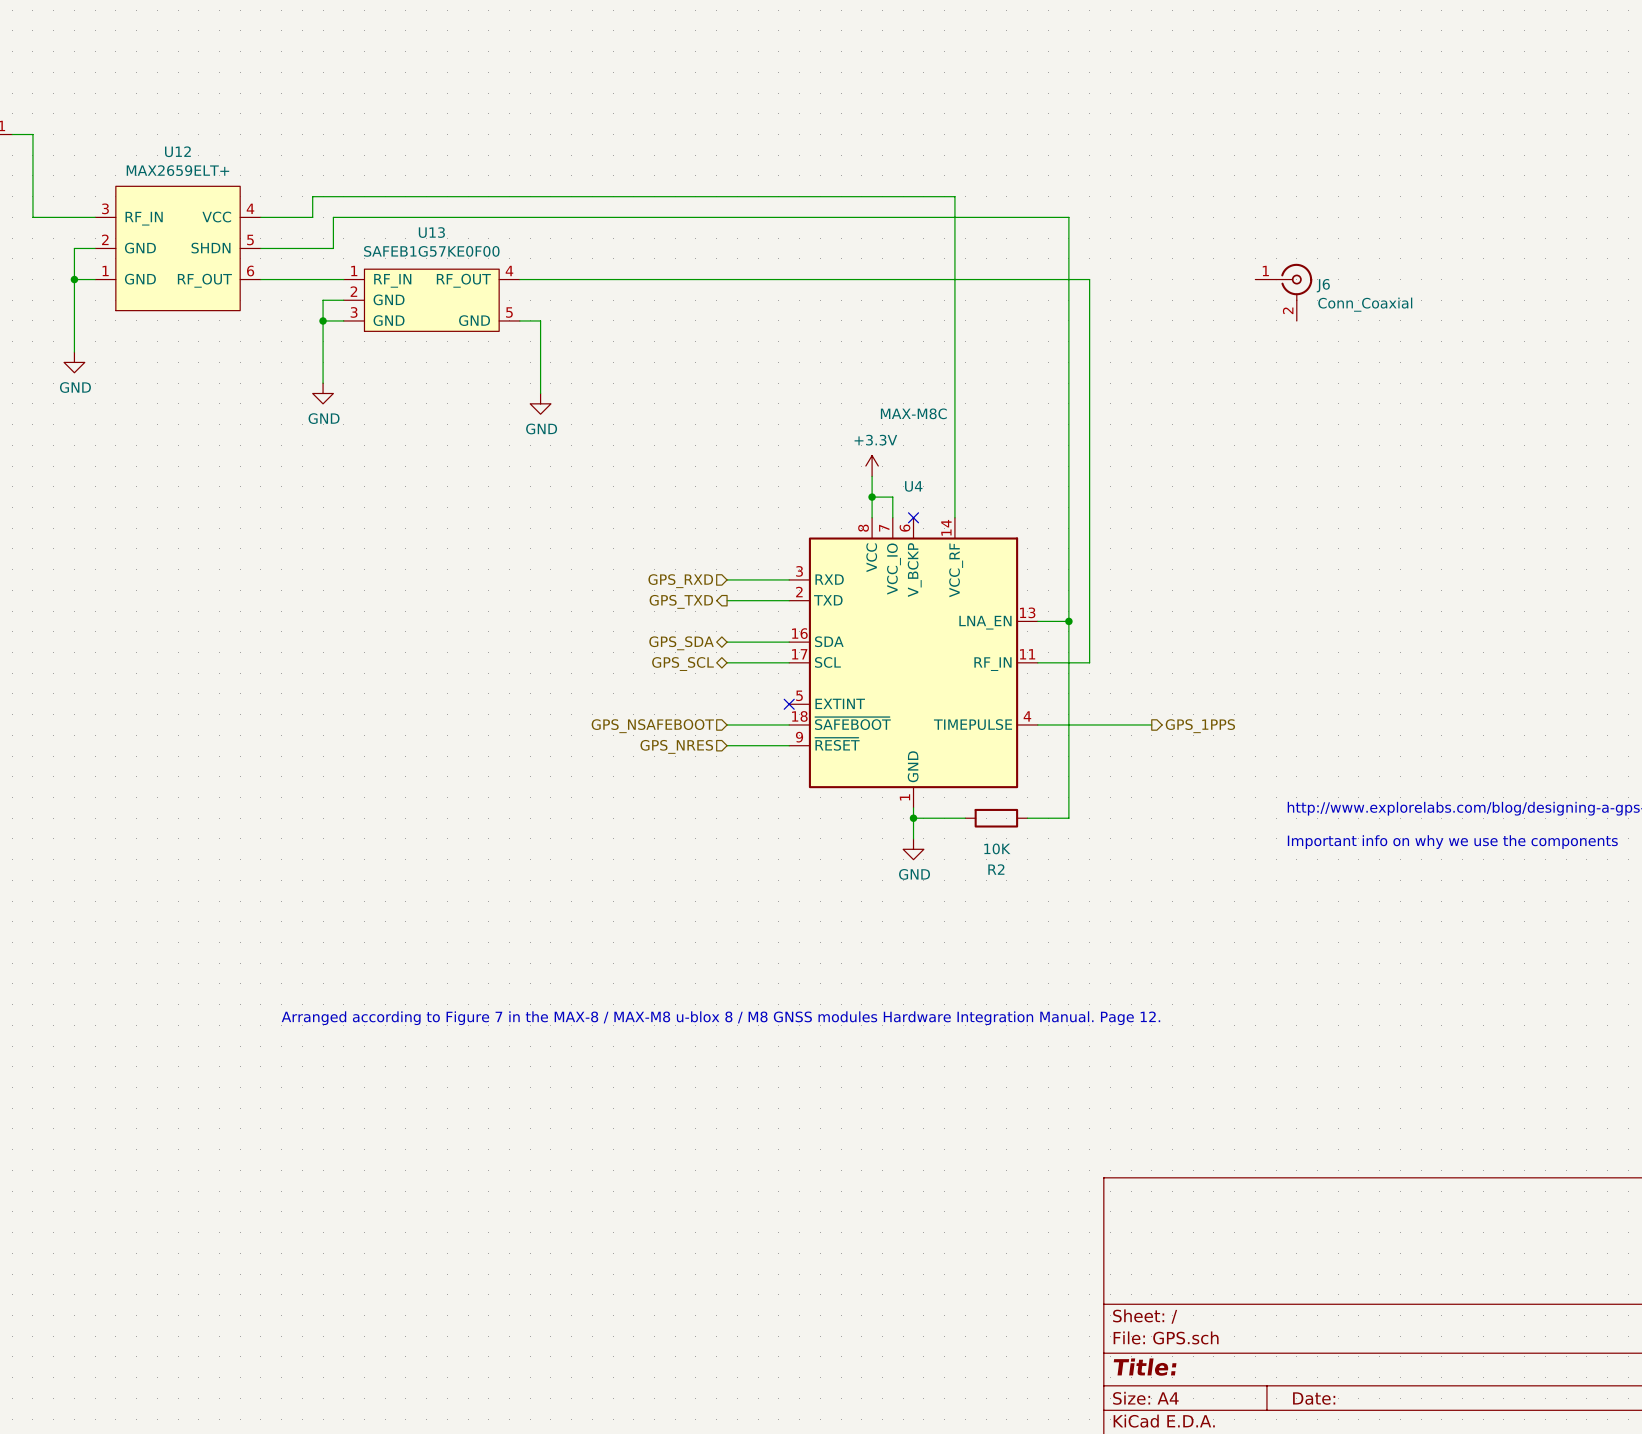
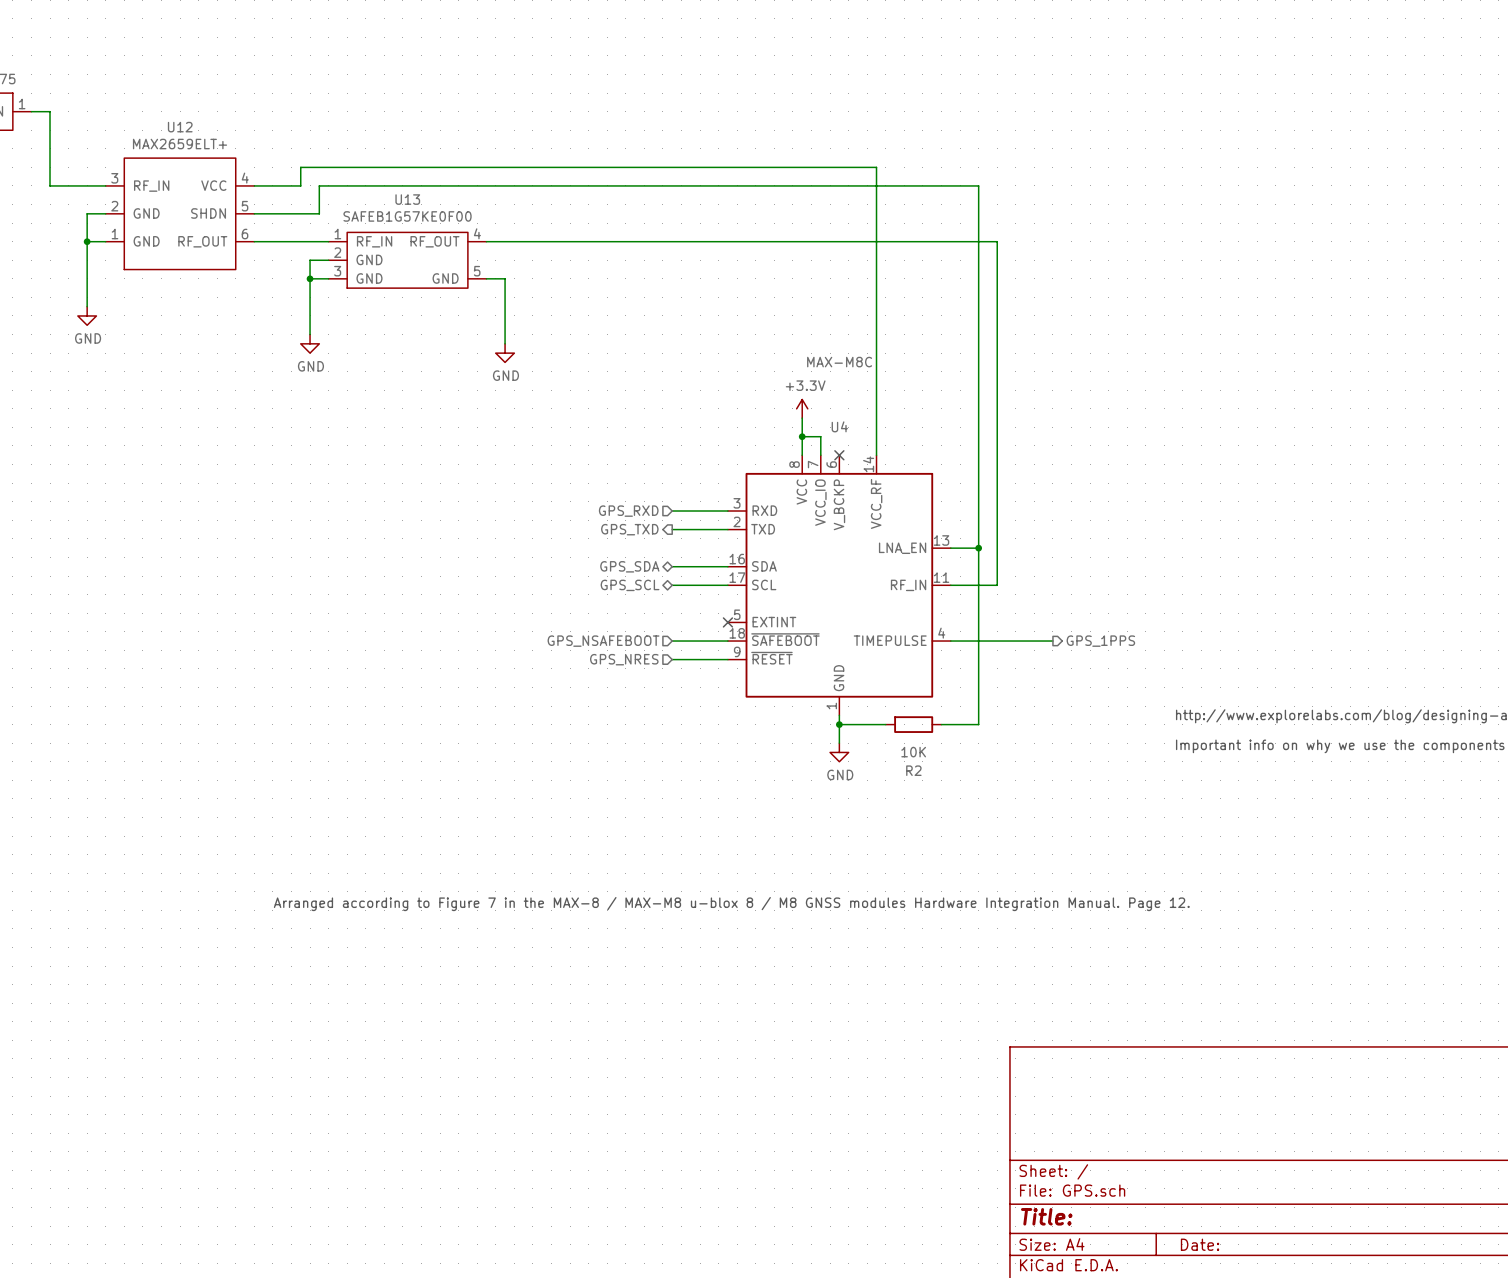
J6: Conn_Coaxial (1283, 292) -> none

